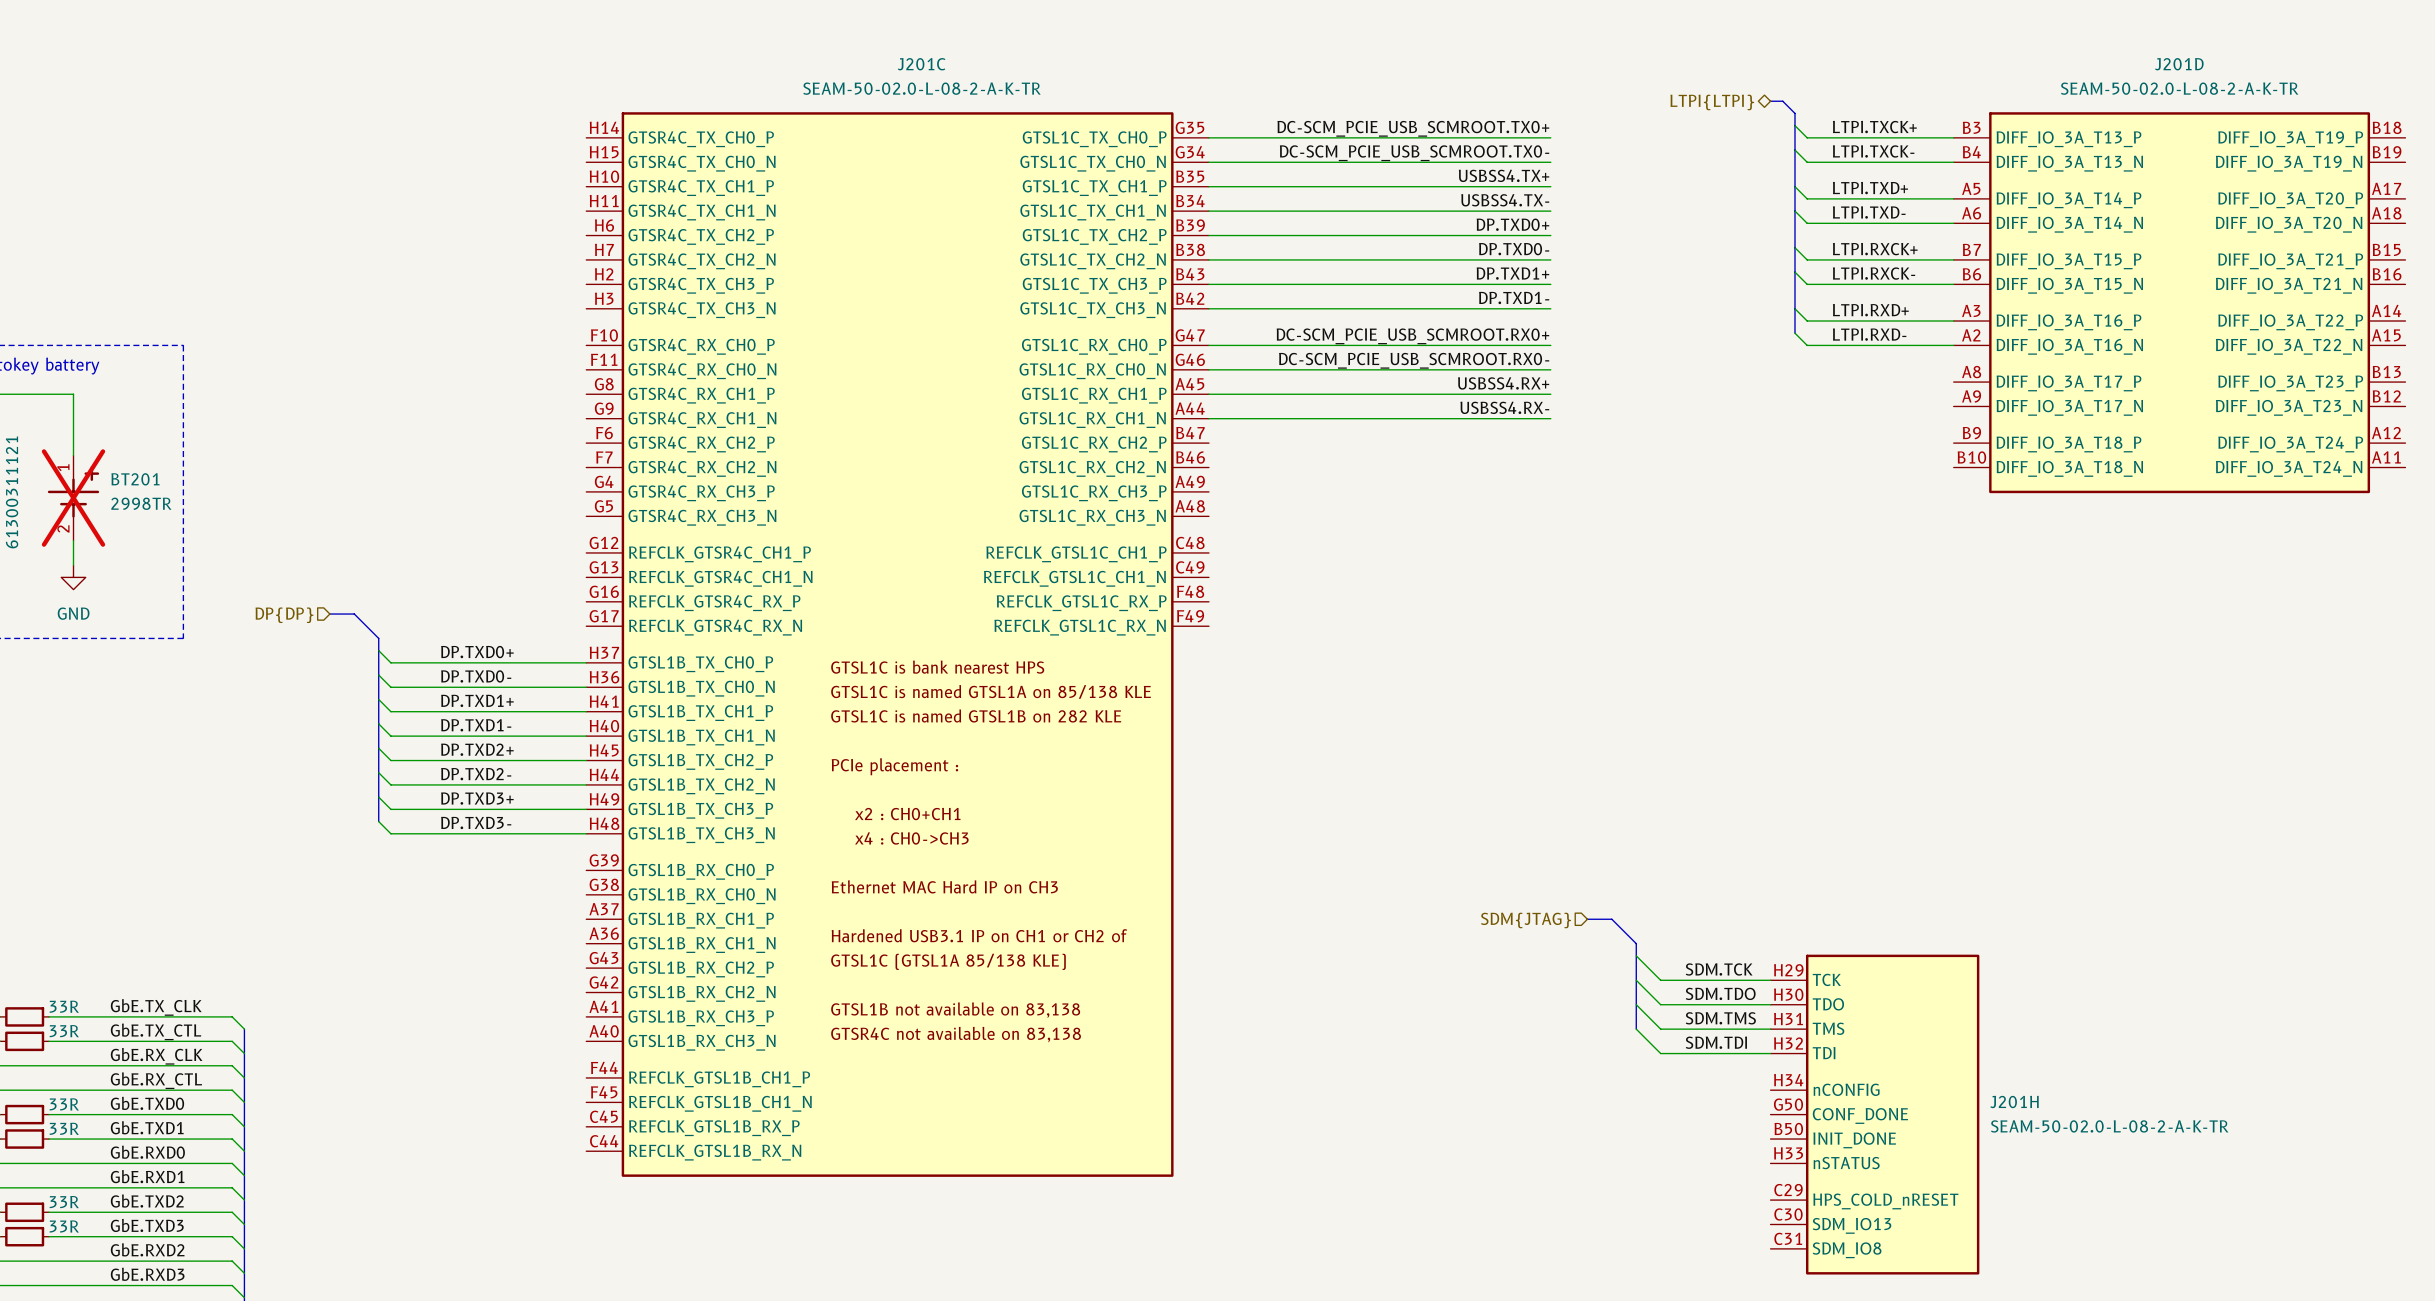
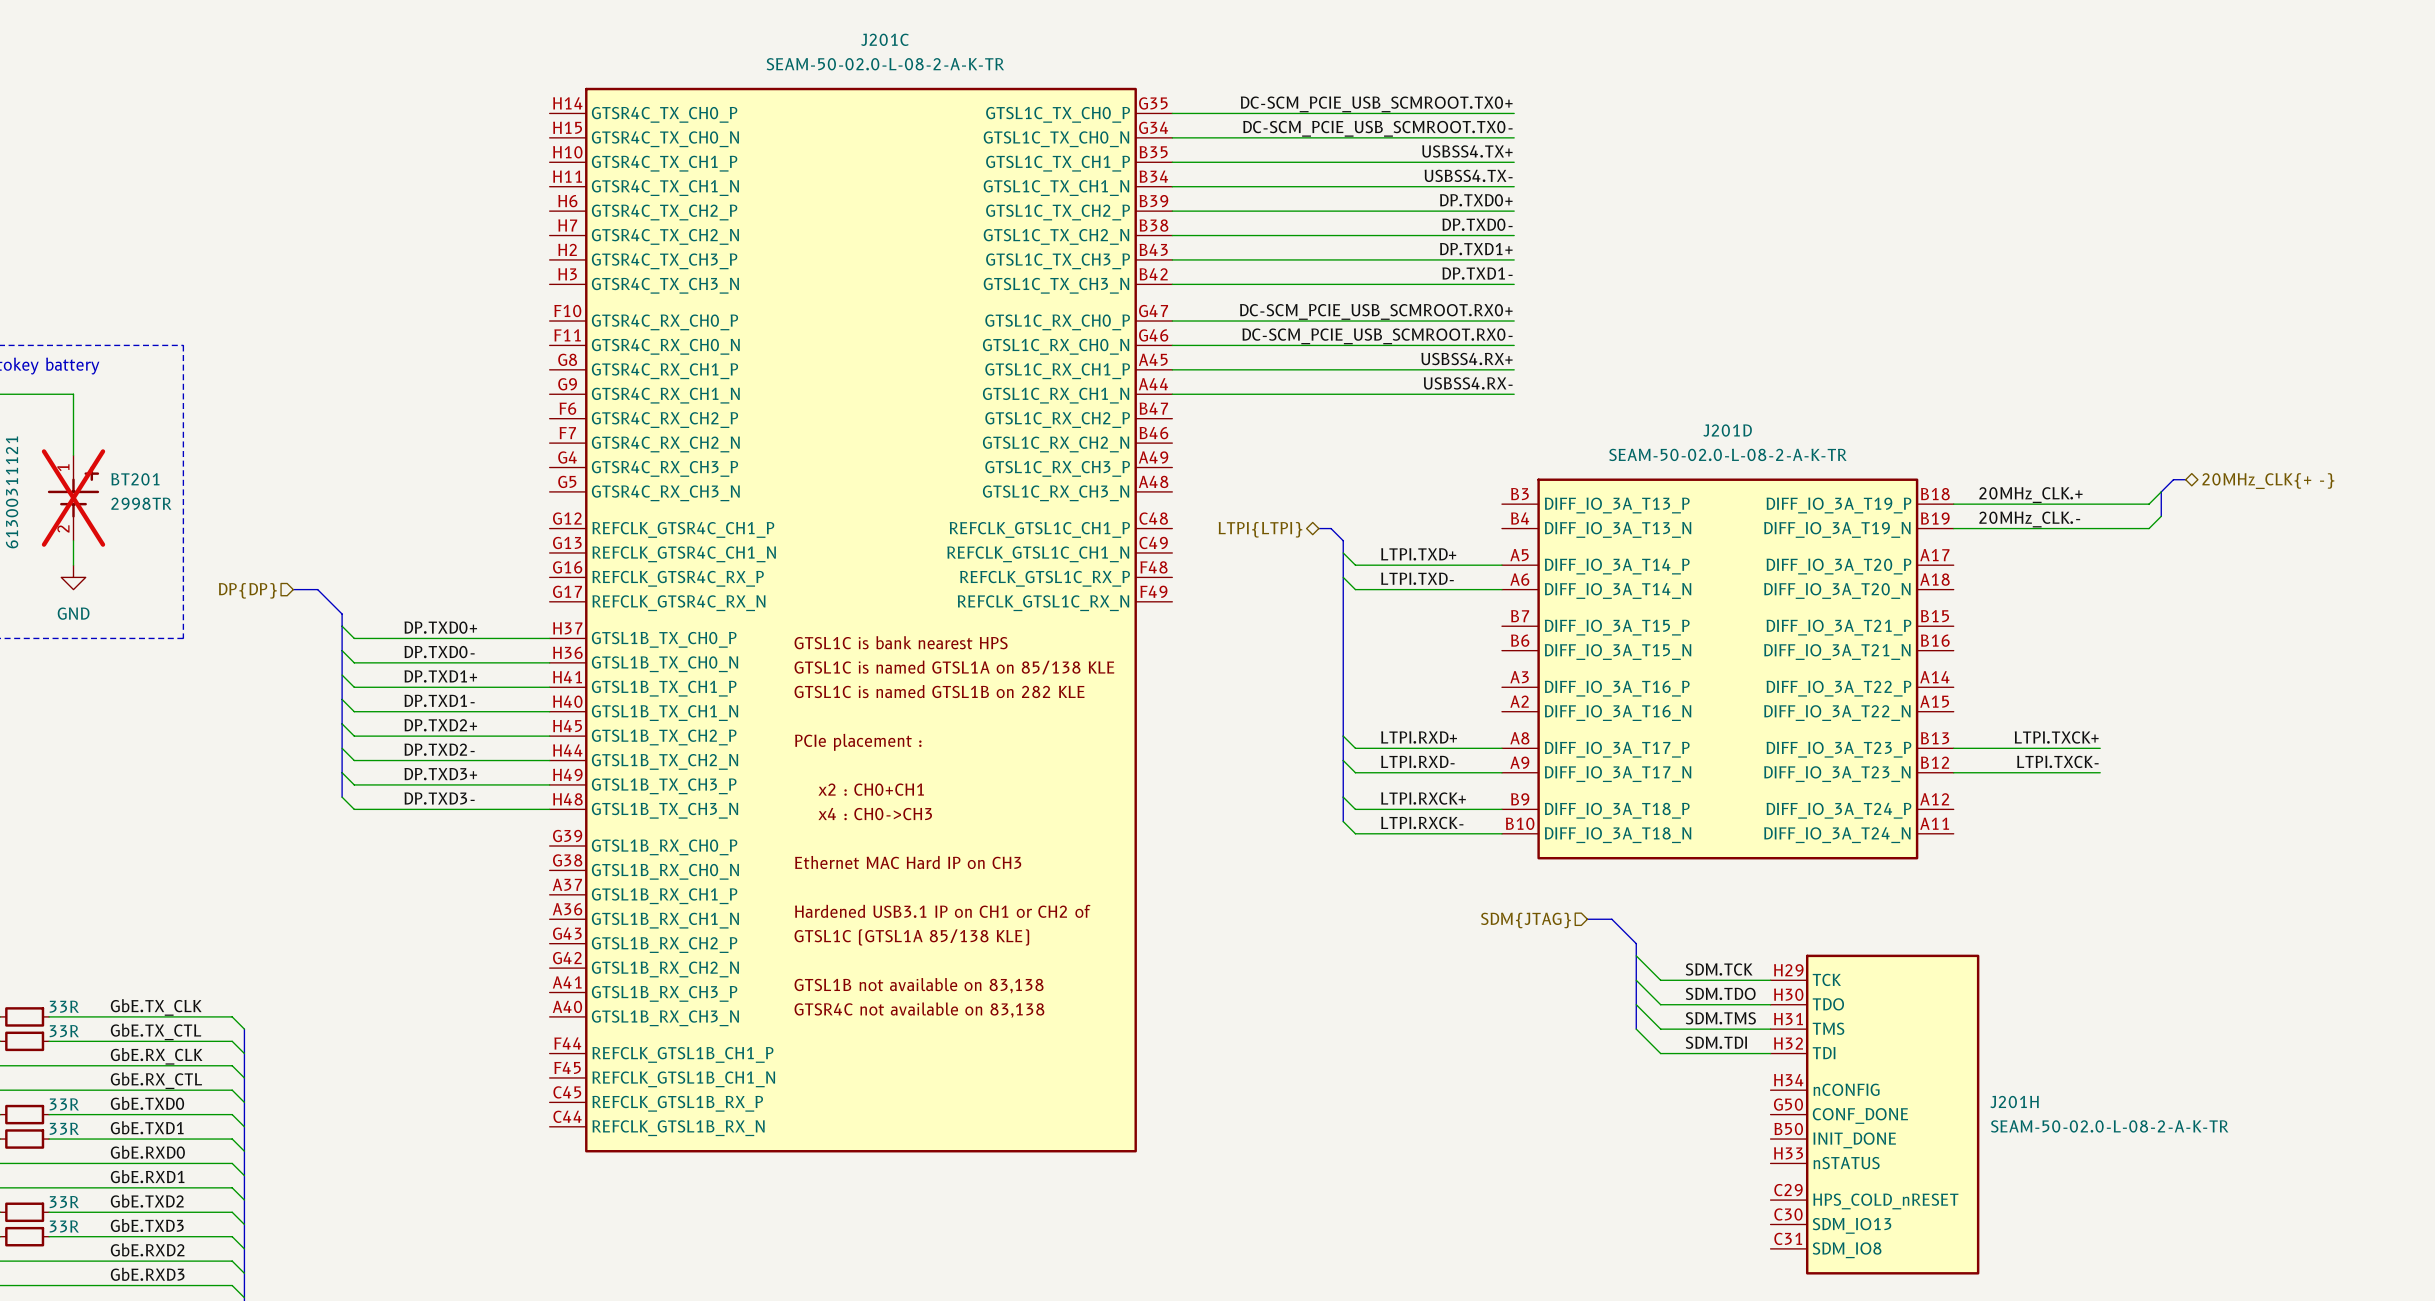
bus: (1770, 101) (1782, 101) (1794, 113) (1794, 333) -> none
hierarchical label: LTPI{LTPI} (1712, 102) -> none
wire: (1794, 125) (1807, 137) (1953, 137) -> none
label: LTPI.TXCK+ (1874, 127) -> none
label position: DC-SCM_PCIE_USB_SCMROOT.TX0+ (1413, 128) -> DC-SCM_PCIE_USB_SCMROOT.TX0+ (1376, 104)
wire: (1514, 137) (1550, 137) -> none
wire: (1794, 150) (1807, 162) (1953, 162) -> none
label: LTPI.TXCK- (1873, 151) -> none
label position: DC-SCM_PCIE_USB_SCMROOT.TX0- (1414, 153) -> DC-SCM_PCIE_USB_SCMROOT.TX0- (1377, 128)
wire: (1514, 162) (1550, 162) -> none
label position: USBSS4.TX+ (1504, 175) -> USBSS4.TX+ (1467, 151)
wire: (1514, 186) (1550, 186) -> none
wire: (1794, 186) (1807, 198) (1953, 198) -> none
label: LTPI.TXD+ (1870, 188) -> none
label position: USBSS4.TX- (1505, 200) -> USBSS4.TX- (1468, 175)
wire: (1514, 211) (1550, 211) -> none
wire: (1794, 211) (1807, 223) (1953, 223) -> none
label: LTPI.TXD- (1869, 212) -> none
label position: DP.TXD0+ (1512, 224) -> DP.TXD0+ (1476, 200)
wire: (1514, 235) (1550, 235) -> none
wire: (1794, 247) (1807, 259) (1953, 259) -> none
label position: DP.TXD0- (1514, 249) -> DP.TXD0- (1477, 224)
label: LTPI.RXCK+ (1875, 249) -> none
wire: (1514, 259) (1550, 259) -> none
wire: (1794, 272) (1807, 284) (1953, 284) -> none
label position: DP.TXD1+ (1512, 273) -> DP.TXD1+ (1476, 249)
label: LTPI.RXCK- (1874, 273) -> none
wire: (1514, 284) (1550, 284) -> none
label position: DP.TXD1- (1514, 297) -> DP.TXD1- (1477, 273)
J201D position: (2179, 302) -> (1727, 668)
wire: (1208, 308) (1550, 308) -> (1172, 113) (1514, 113)
wire: (1794, 308) (1807, 321) (1953, 321) -> none
label: LTPI.RXD+ (1870, 310) -> none
wire: (1794, 333) (1807, 345) (1953, 345) -> none
label: LTPI.RXD- (1869, 334) -> none
label position: DC-SCM_PCIE_USB_SCMROOT.RX0+ (1412, 336) -> DC-SCM_PCIE_USB_SCMROOT.RX0+ (1376, 311)
wire: (1514, 345) (1550, 345) -> none
label position: DC-SCM_PCIE_USB_SCMROOT.RX0- (1414, 360) -> DC-SCM_PCIE_USB_SCMROOT.RX0- (1377, 336)
wire: (1514, 369) (1550, 369) -> none
label position: USBSS4.RX+ (1503, 383) -> USBSS4.RX+ (1466, 359)
wire: (1514, 394) (1550, 394) -> none
label position: USBSS4.RX- (1504, 407) -> USBSS4.RX- (1468, 383)
wire: (1208, 418) (1550, 418) -> (1172, 321) (1514, 321)
bus: none -> (2185, 479) (2173, 479) (2161, 491) (2161, 516)
hierarchical label: none -> 20MHz_CLK{+ -} (2268, 481)
wire: none -> (2161, 491) (2149, 504) (1953, 504)
label: none -> 20MHz_CLK.+ (2030, 495)
wire: none -> (2161, 516) (2149, 528) (1953, 528)
label: none -> 20MHz_CLK.- (2029, 519)
bus: none -> (1318, 528) (1331, 528) (1343, 540) (1343, 821)
hierarchical label: none -> LTPI{LTPI} (1260, 529)
wire: none -> (1343, 552) (1355, 565) (1501, 565)
label: none -> LTPI.TXD+ (1418, 554)
wire: none -> (1343, 577) (1355, 589) (1501, 589)
label: none -> LTPI.TXD- (1417, 578)
bus: (329, 614) (354, 614) (378, 638) (378, 821) -> (293, 589) (317, 589) (342, 614) (342, 797)
hierarchical label position: DP{DP} (284, 615) -> DP{DP} (247, 590)
J201C position: (897, 644) -> (860, 620)
wire: (378, 650) (390, 662) -> (342, 650) (354, 662) (390, 662)
label position: DP.TXD0+ (477, 652) -> DP.TXD0+ (440, 627)
wire: (378, 675) (390, 687) -> (342, 675) (354, 687) (390, 687)
label position: DP.TXD0- (476, 676) -> DP.TXD0- (439, 652)
wire: (378, 699) (390, 711) -> (342, 699) (354, 711) (390, 711)
label position: DP.TXD1+ (477, 700) -> DP.TXD1+ (440, 676)
wire: (378, 723) (390, 736) -> (342, 723) (354, 736) (390, 736)
label position: DP.TXD1- (476, 725) -> DP.TXD1- (439, 700)
wire: none -> (1343, 736) (1355, 748) (1501, 748)
label: none -> LTPI.RXD+ (1419, 737)
label: none -> LTPI.TXCK+ (2056, 737)
wire: (378, 748) (390, 760) -> (342, 748) (354, 760) (390, 760)
wire: none -> (1953, 748) (2100, 748)
label position: DP.TXD2+ (477, 749) -> DP.TXD2+ (440, 725)
wire: none -> (1343, 760) (1355, 772) (1501, 772)
label: none -> LTPI.RXD- (1417, 761)
label: none -> LTPI.TXCK- (2057, 761)
wire: (378, 772) (390, 784) -> (342, 772) (354, 784) (390, 784)
wire: none -> (1953, 772) (2100, 772)
label position: DP.TXD2- (476, 774) -> DP.TXD2- (439, 749)
wire: (378, 797) (390, 809) -> (342, 797) (354, 809) (390, 809)
wire: none -> (1343, 797) (1355, 809) (1501, 809)
label position: DP.TXD3+ (477, 798) -> DP.TXD3+ (440, 774)
label: none -> LTPI.RXCK+ (1423, 798)
wire: (378, 821) (390, 833) (586, 833) -> (342, 626) (354, 638) (549, 638)
wire: none -> (1343, 821) (1355, 833) (1501, 833)
label position: DP.TXD3- (476, 822) -> DP.TXD3- (439, 798)
label: none -> LTPI.RXCK- (1422, 822)

